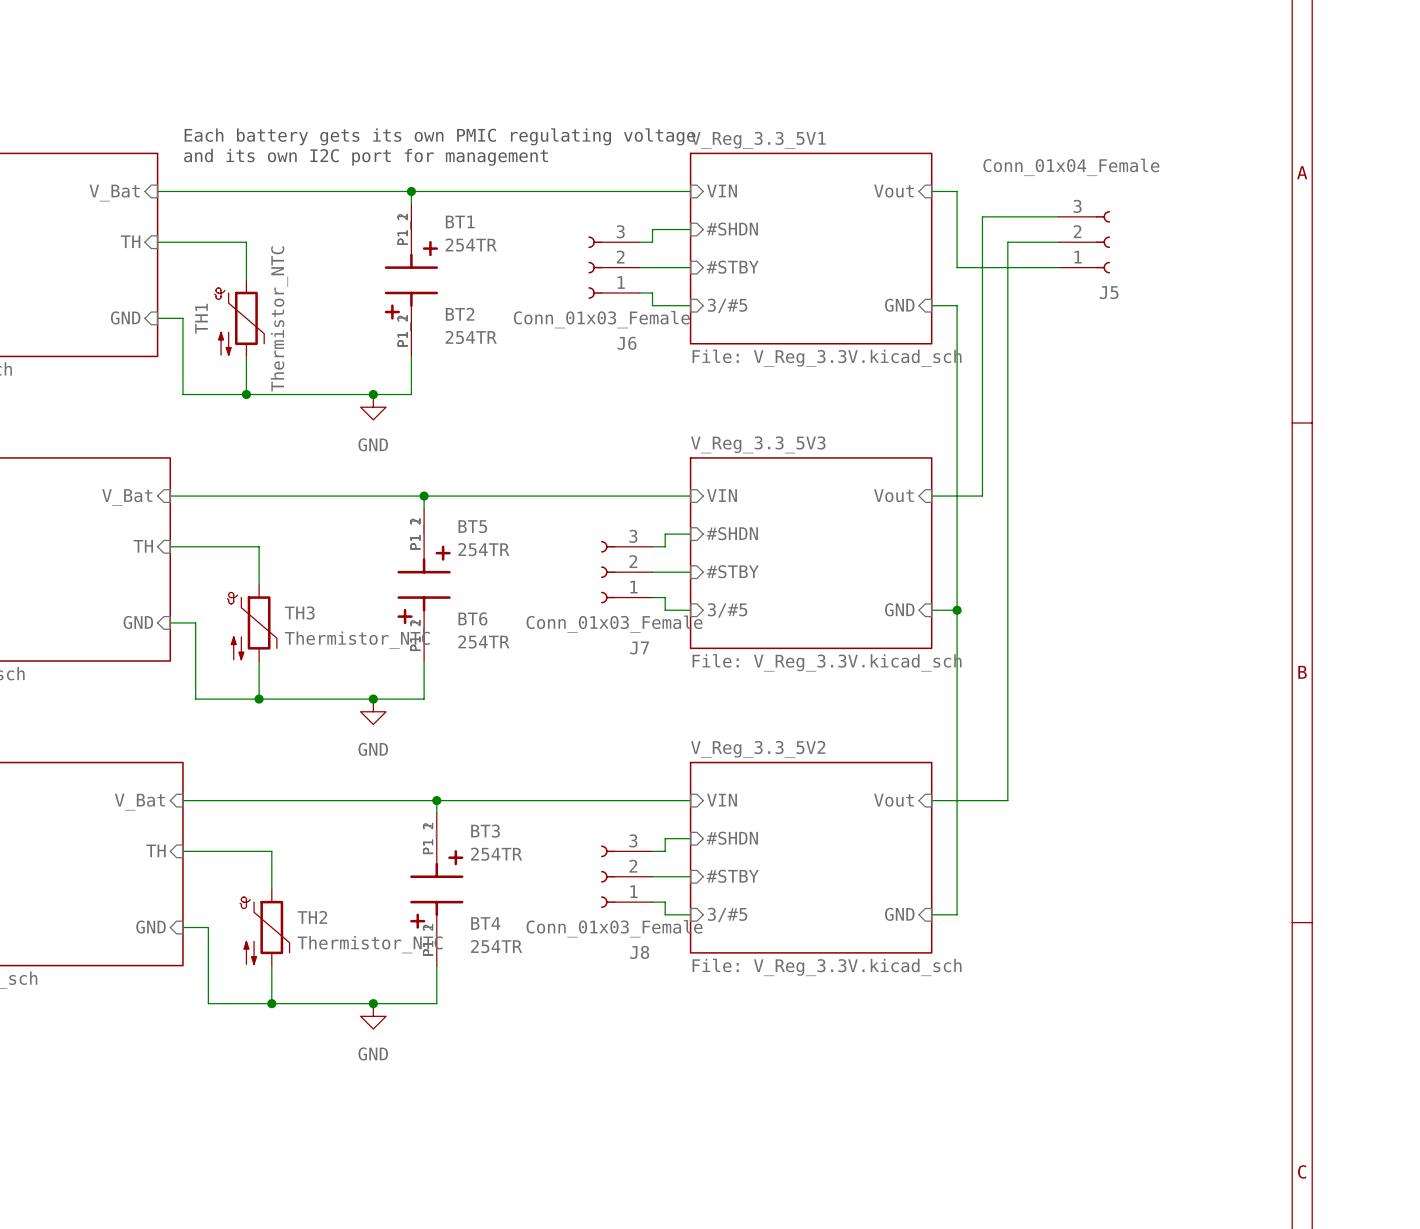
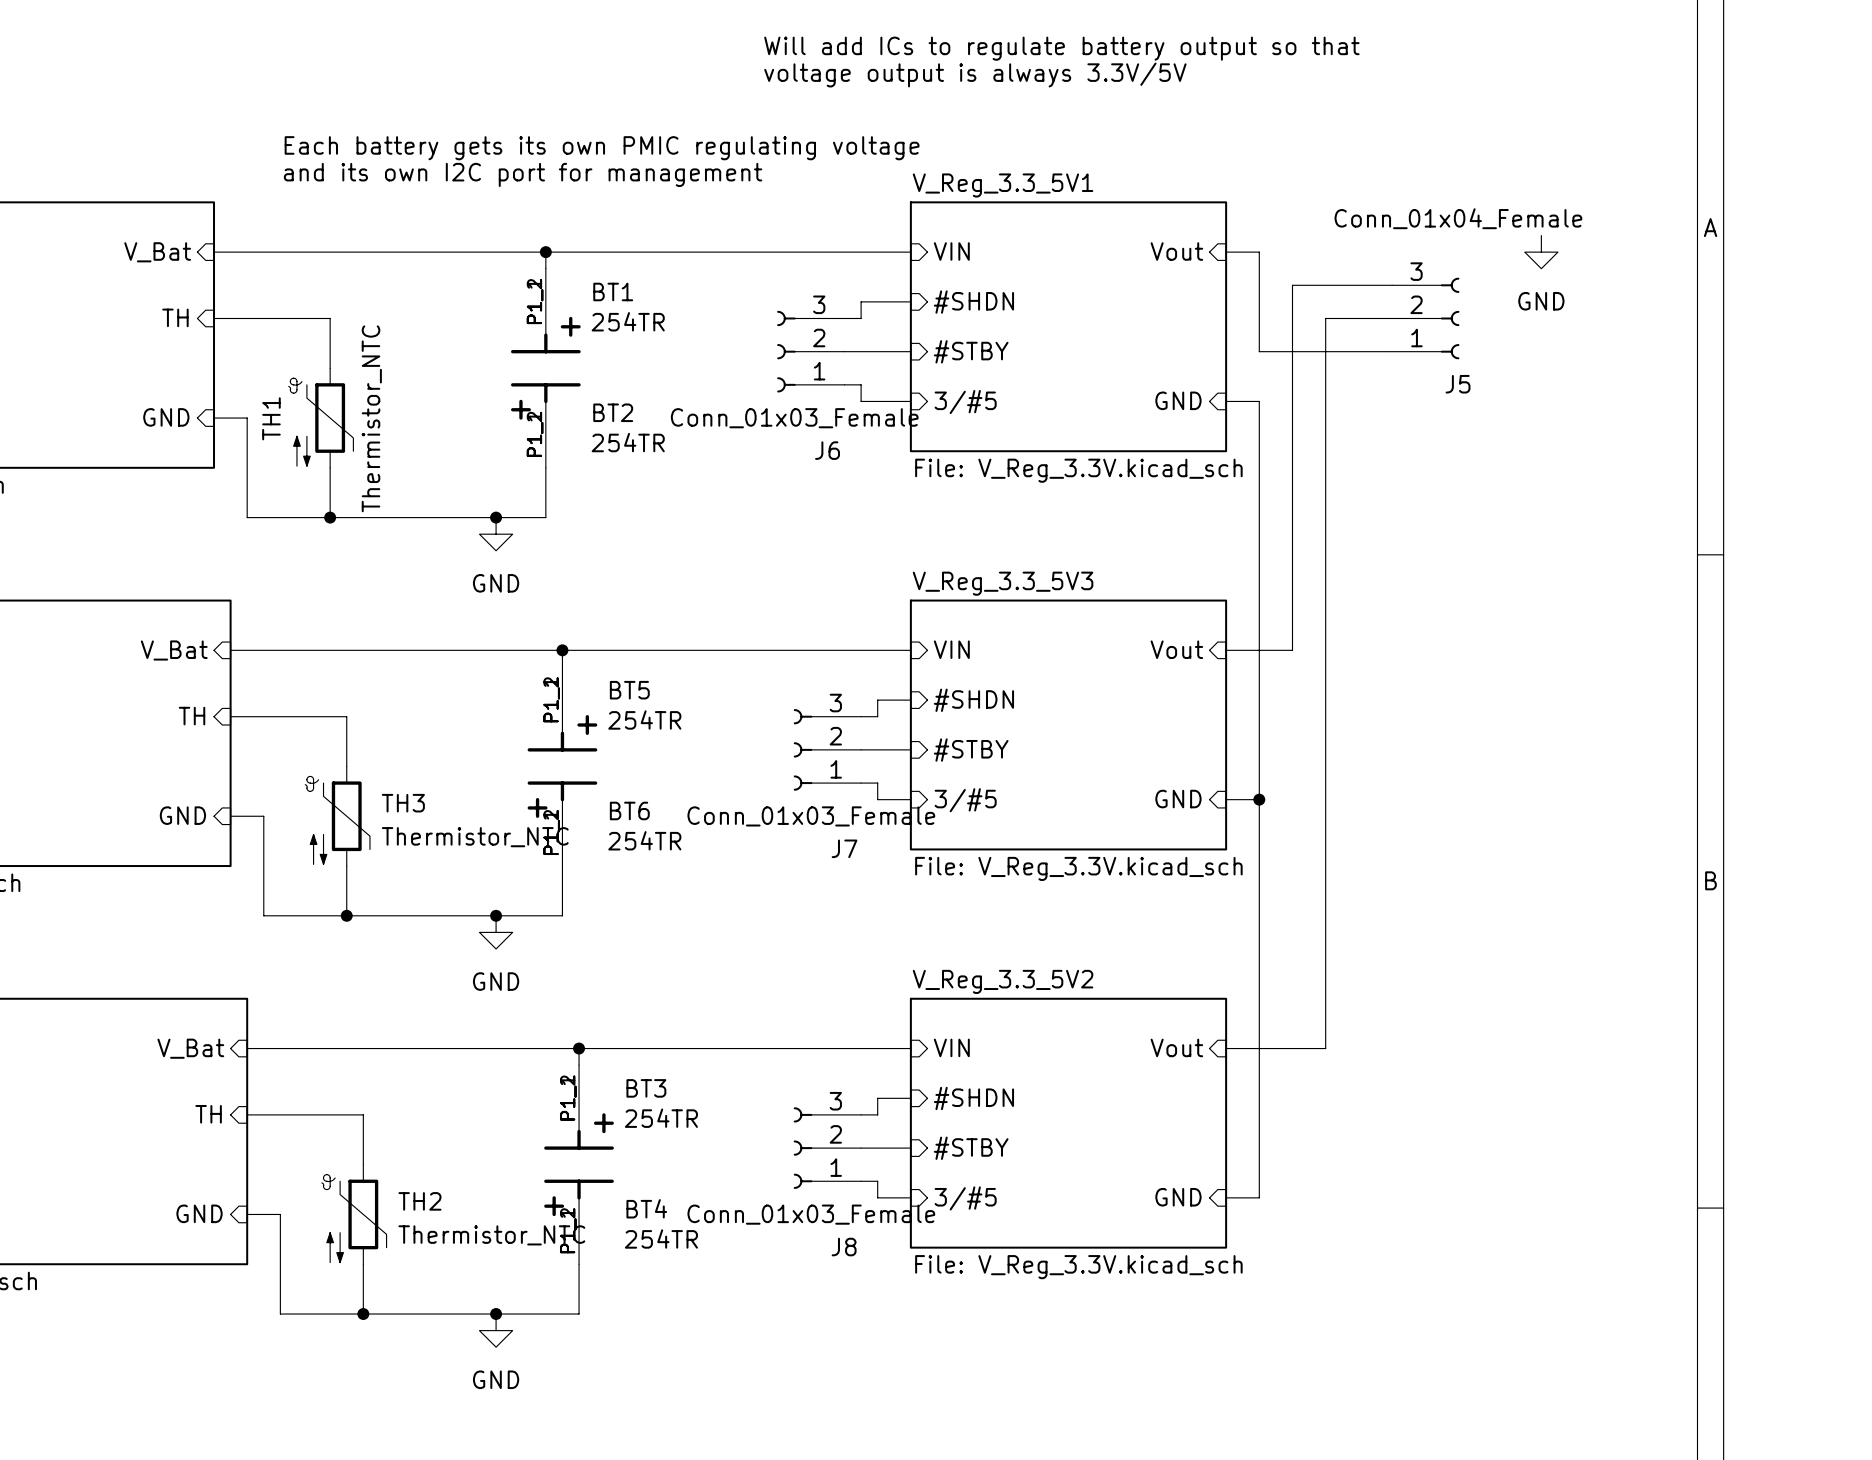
text: none -> Will add ICs to regulate battery output so that (1061, 48)
text: none -> voltage output is always 3.3V/5V (975, 74)
text position: Each battery gets its own PMIC regulating voltage (440, 136) -> Each battery gets its own PMIC regulating voltage (602, 148)
text position: and its own I2C port for management (366, 157) -> and its own I2C port for management (523, 174)
J5 value position: Conn_01x04_Female (1071, 167) -> Conn_01x04_Female (1458, 218)
power symbol: none -> GND (1541, 252)

